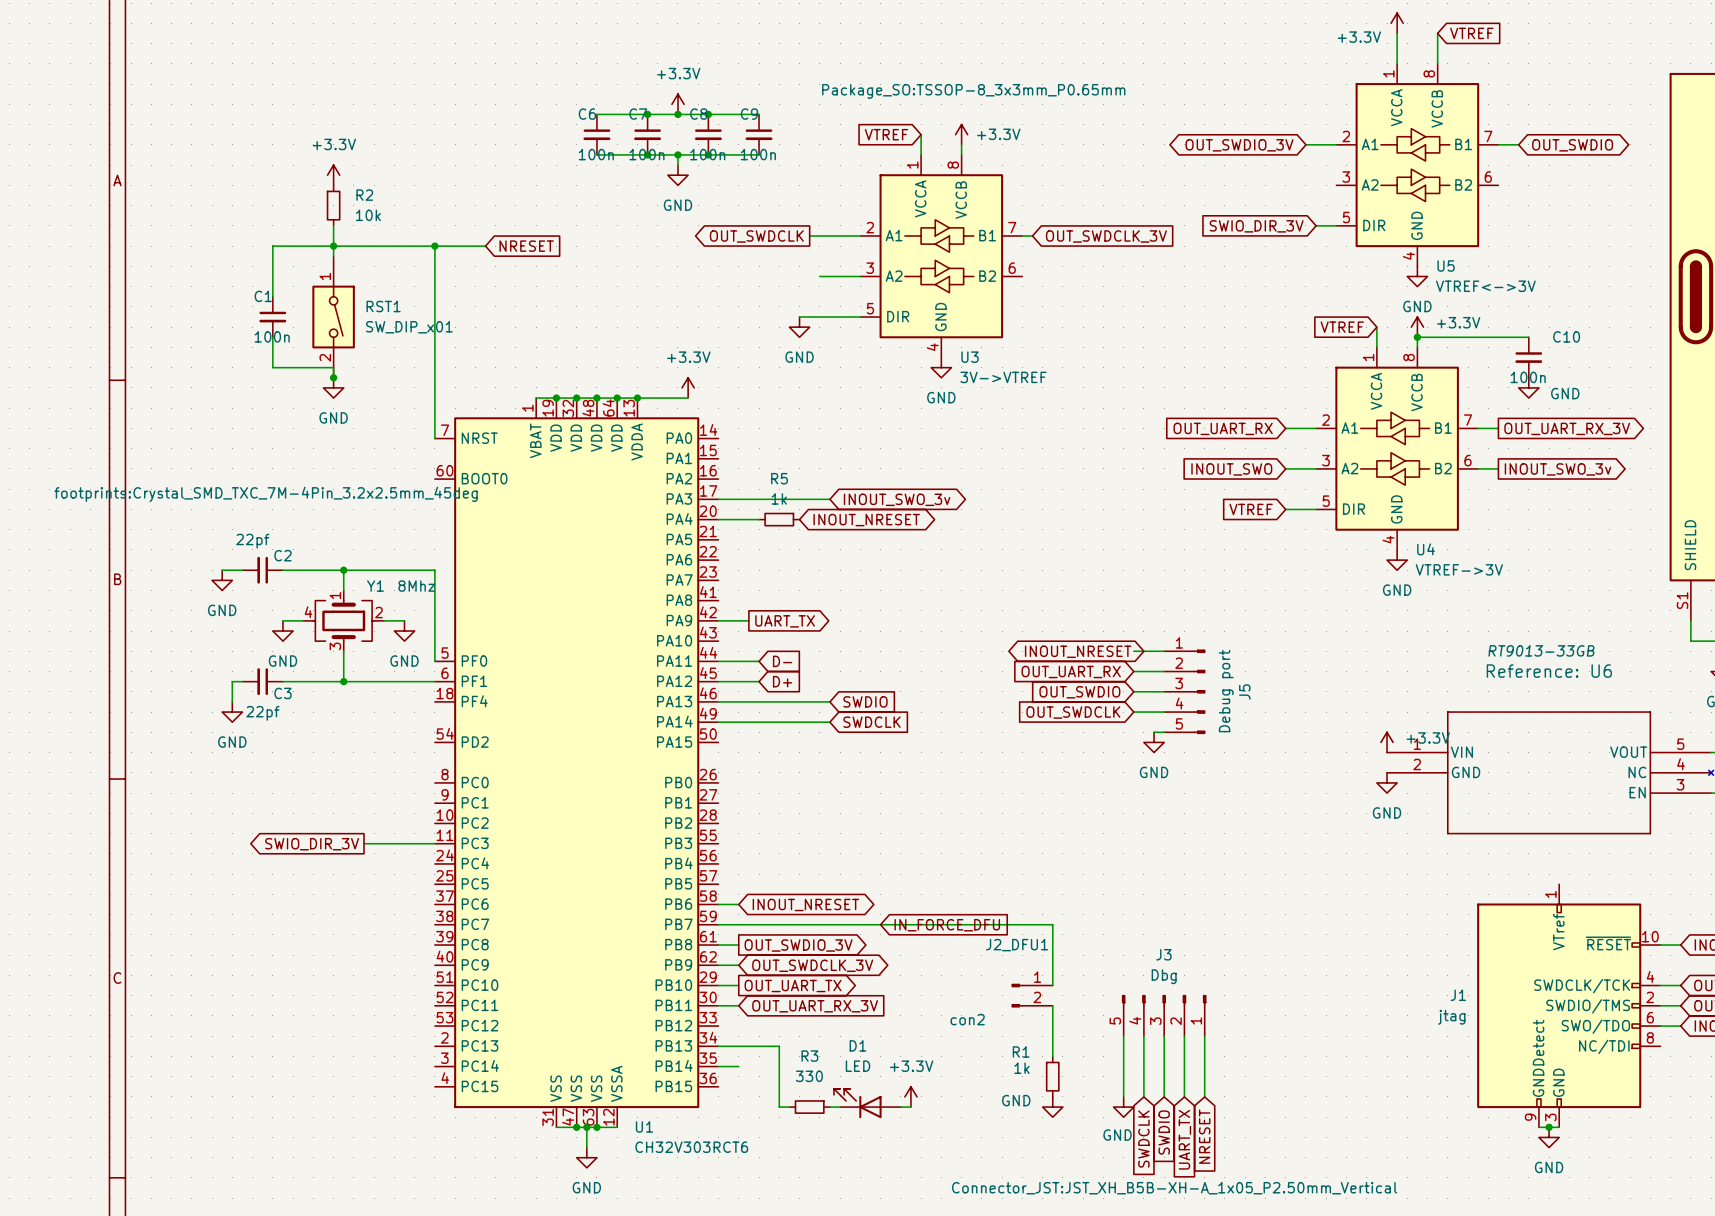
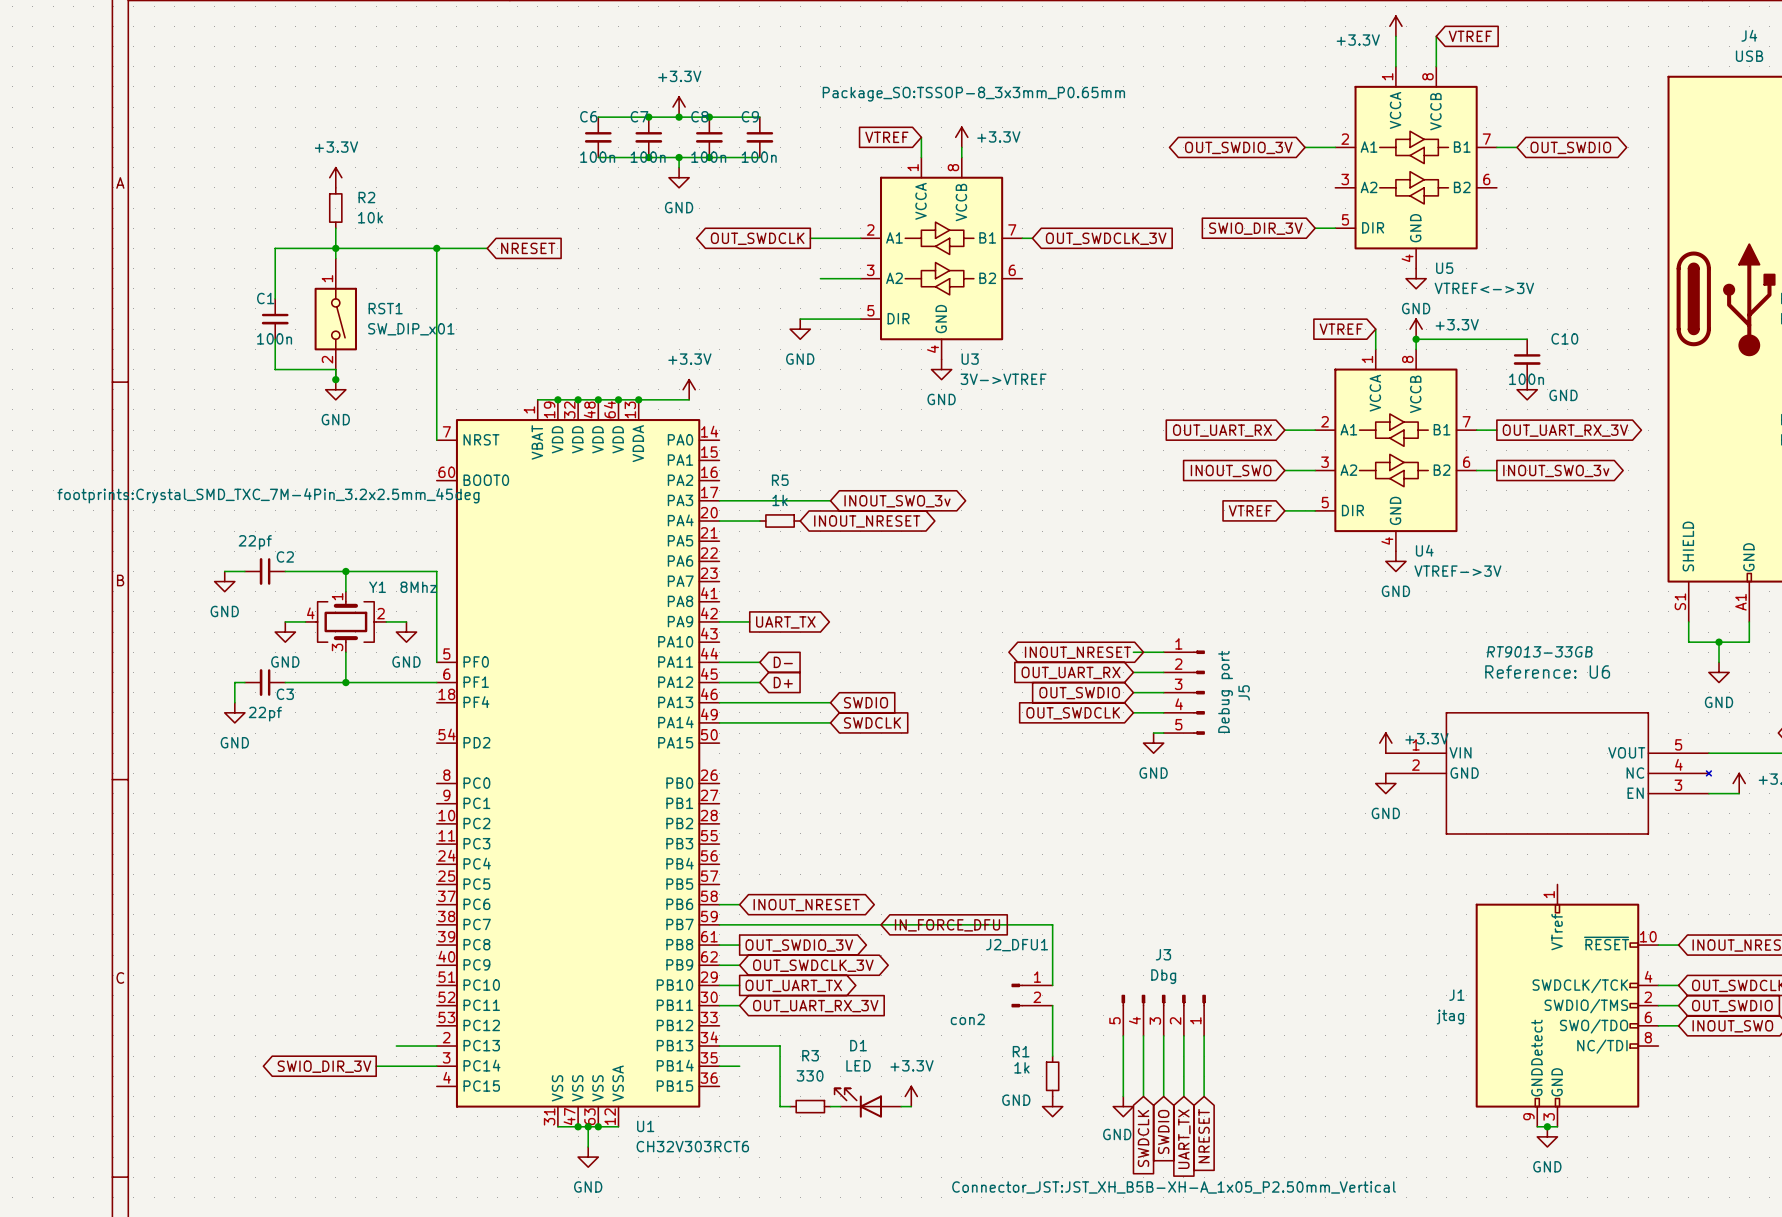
wire: (363, 843) (434, 843) -> none
global label: SWIO_DIR_3V (312, 844) -> none
wire: none -> (396, 1046) (436, 1046)
wire: none -> (376, 1066) (436, 1066)
global label: none -> SWIO_DIR_3V (324, 1066)

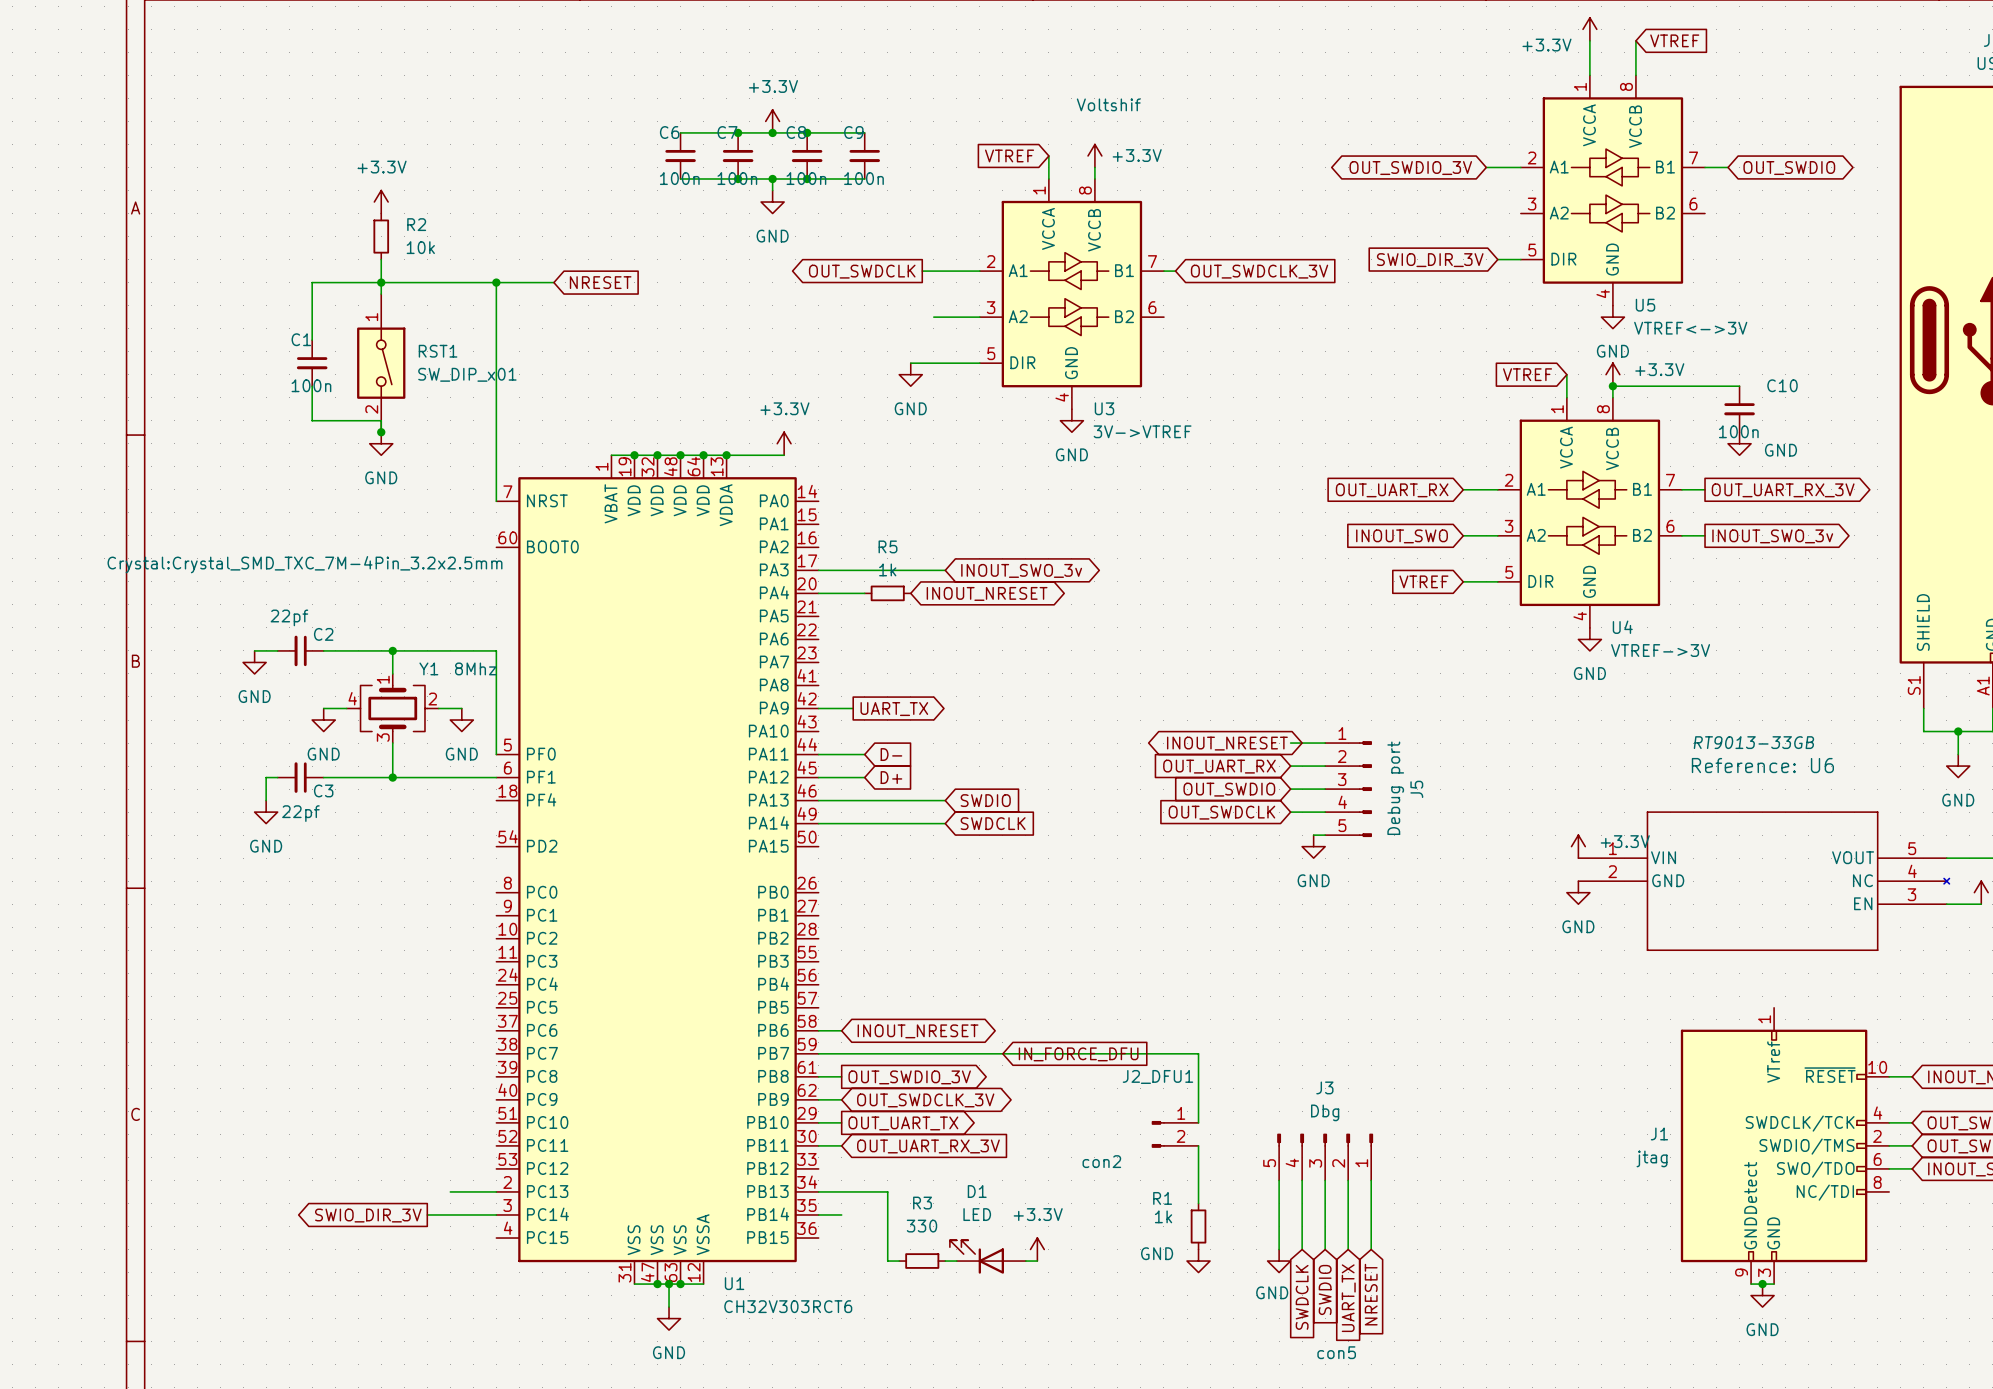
U3 text: Package_SO:TSSOP-8_3x3mm_P0.65mm (973, 94) -> Voltshif (1108, 104)
Y1 text: footprints:Crystal_SMD_TXC_7M-4Pin_3.2x2.5mm_45deg (268, 495) -> Crystal:Crystal_SMD_TXC_7M-4Pin_3.2x2.5mm (304, 564)
J3 text: Connector_JST:JST_XH_B5B-XH-A_1x05_P2.50mm_Vertical (1174, 1187) -> con5 (1336, 1352)

